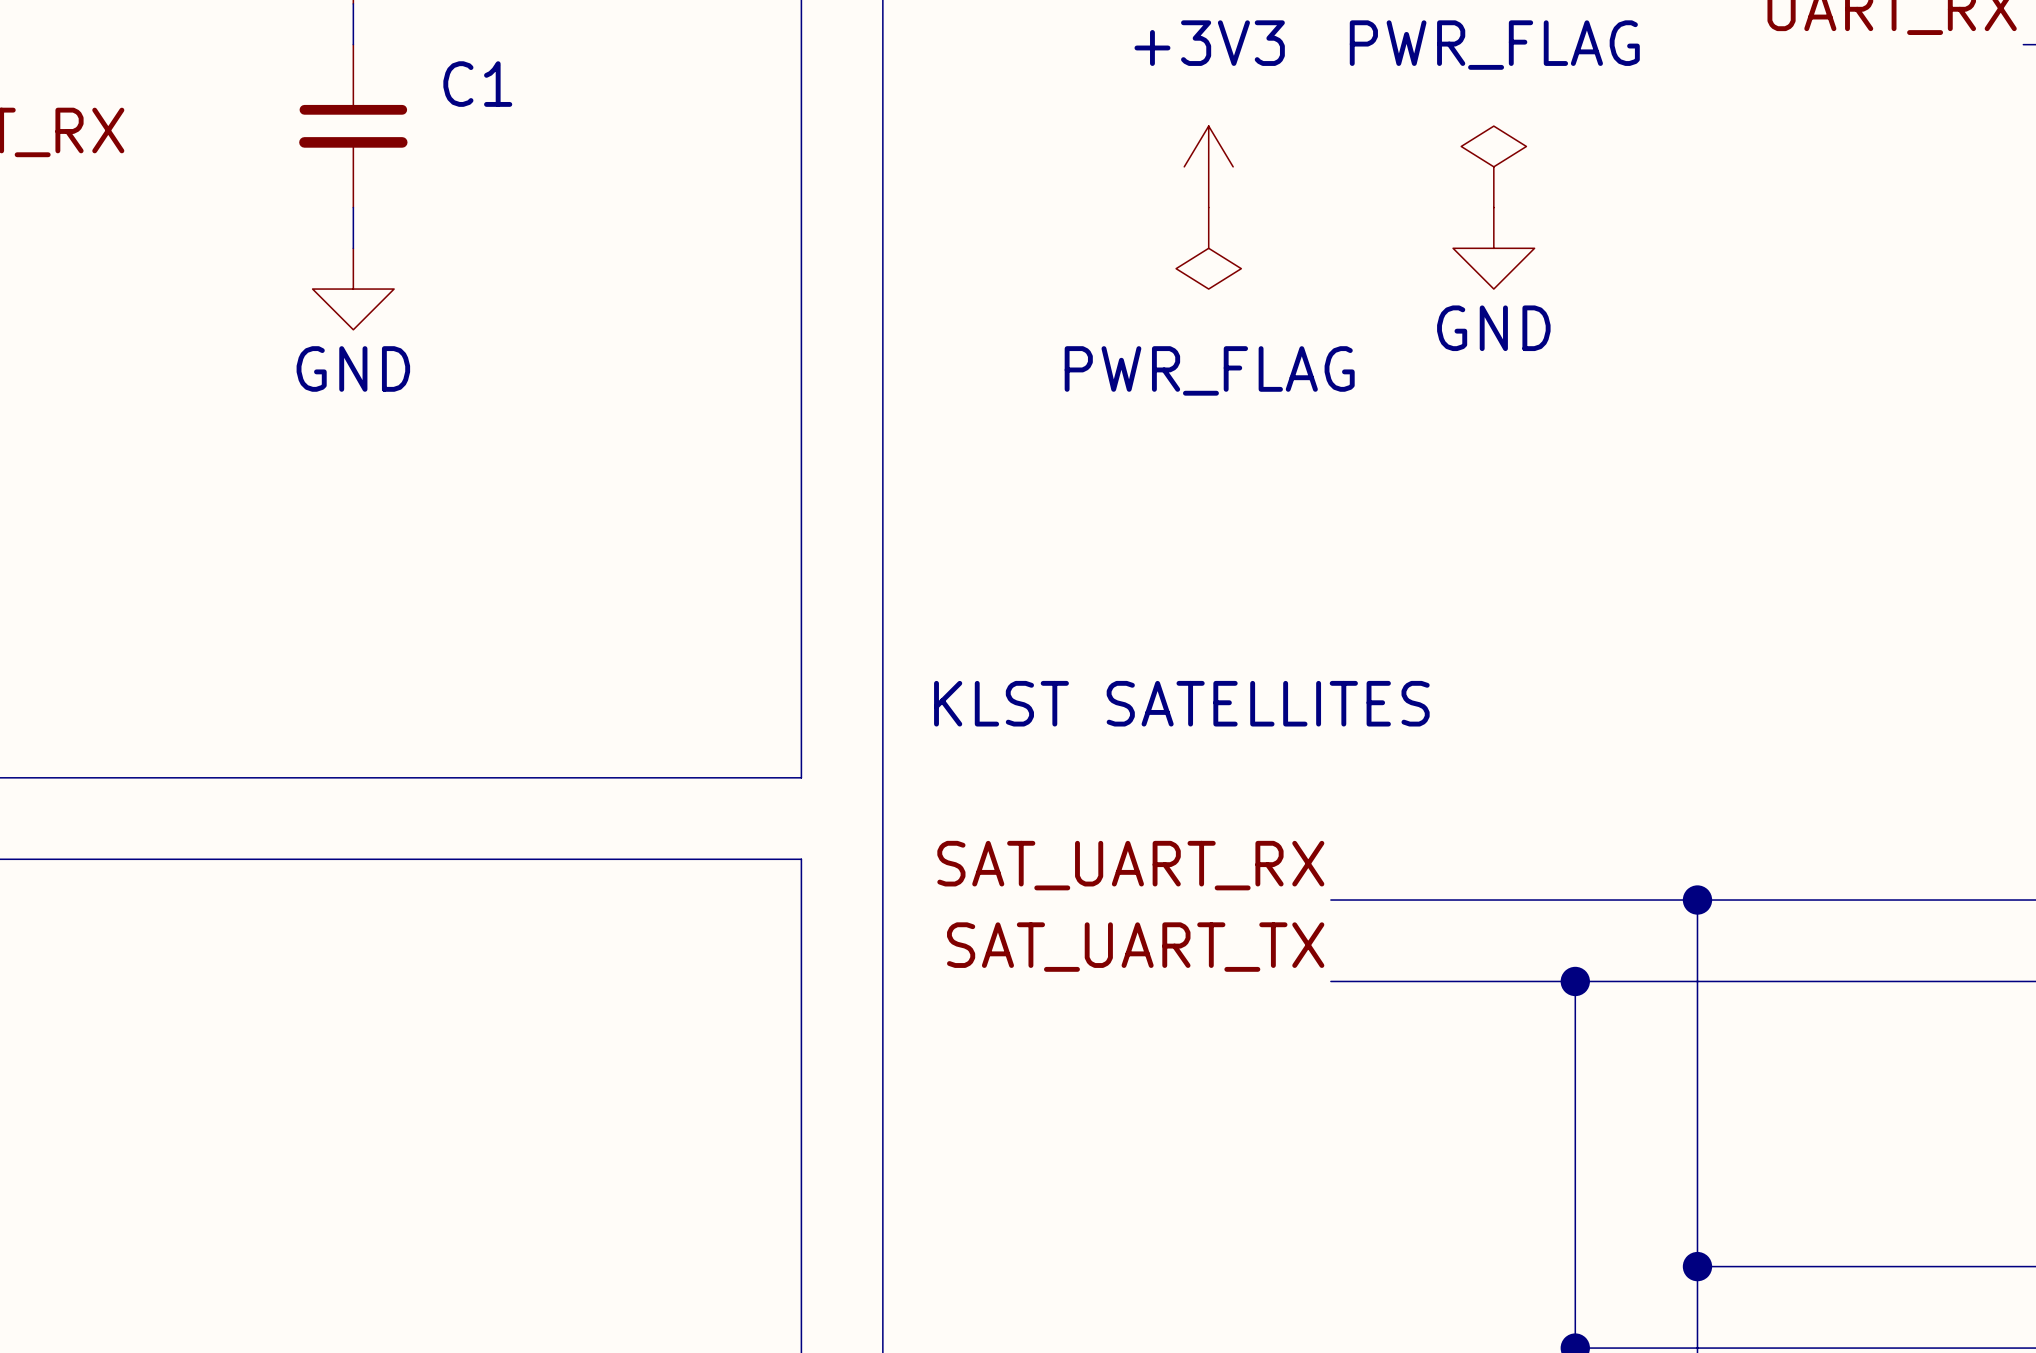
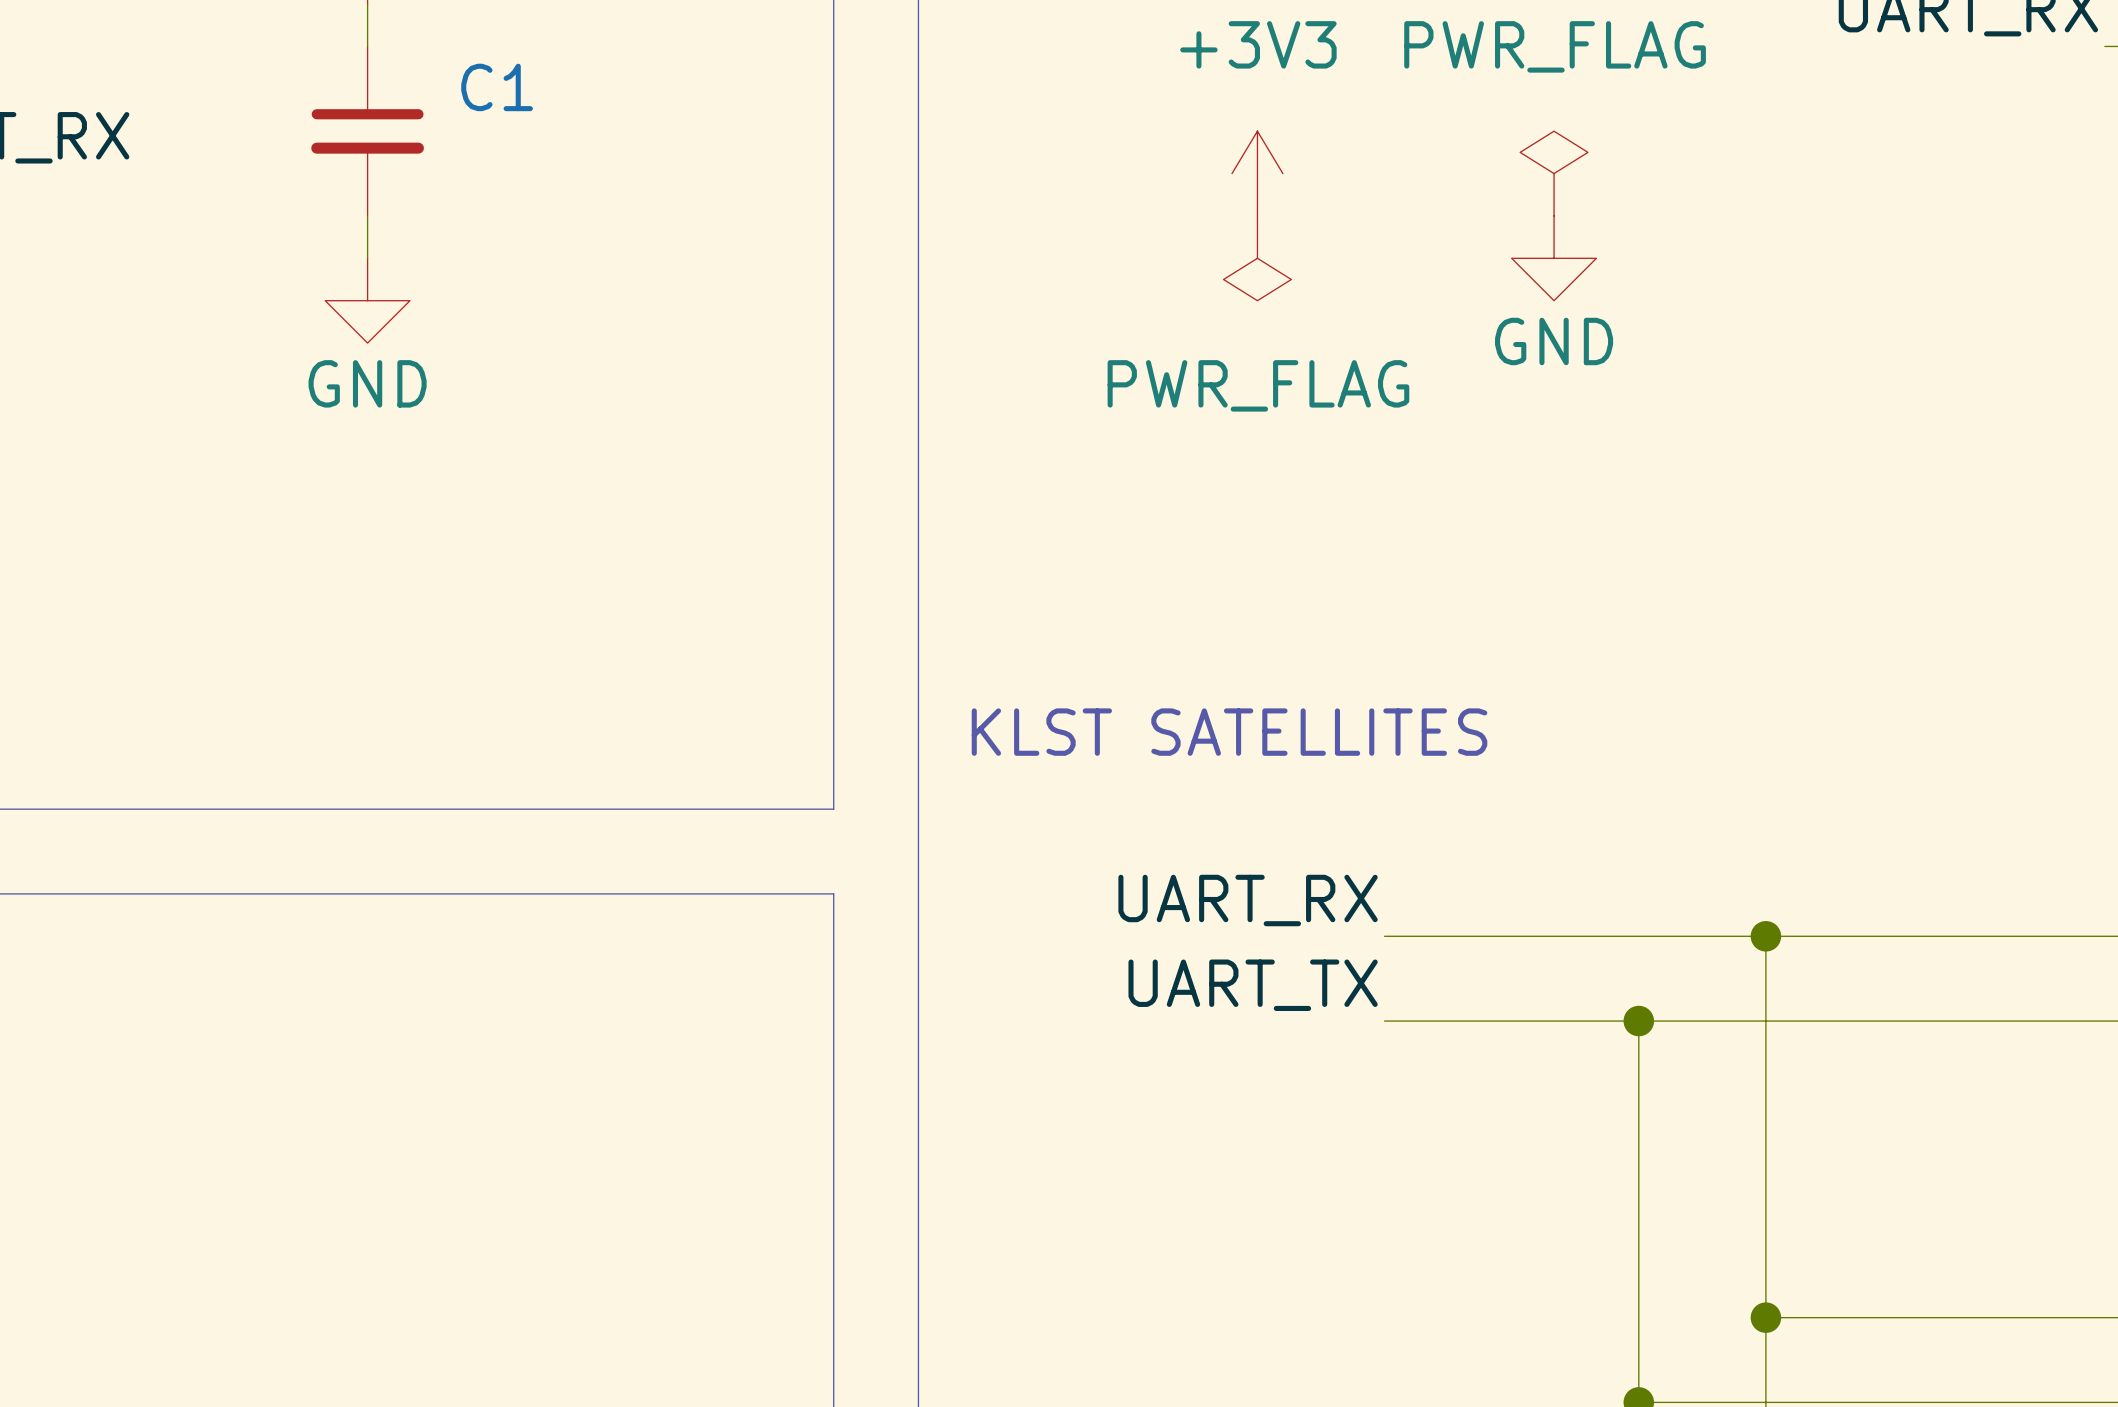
label: SAT_UART_RX (1130, 865) -> UART_RX (1248, 900)
label: SAT_UART_TX (1135, 947) -> UART_TX (1253, 985)

